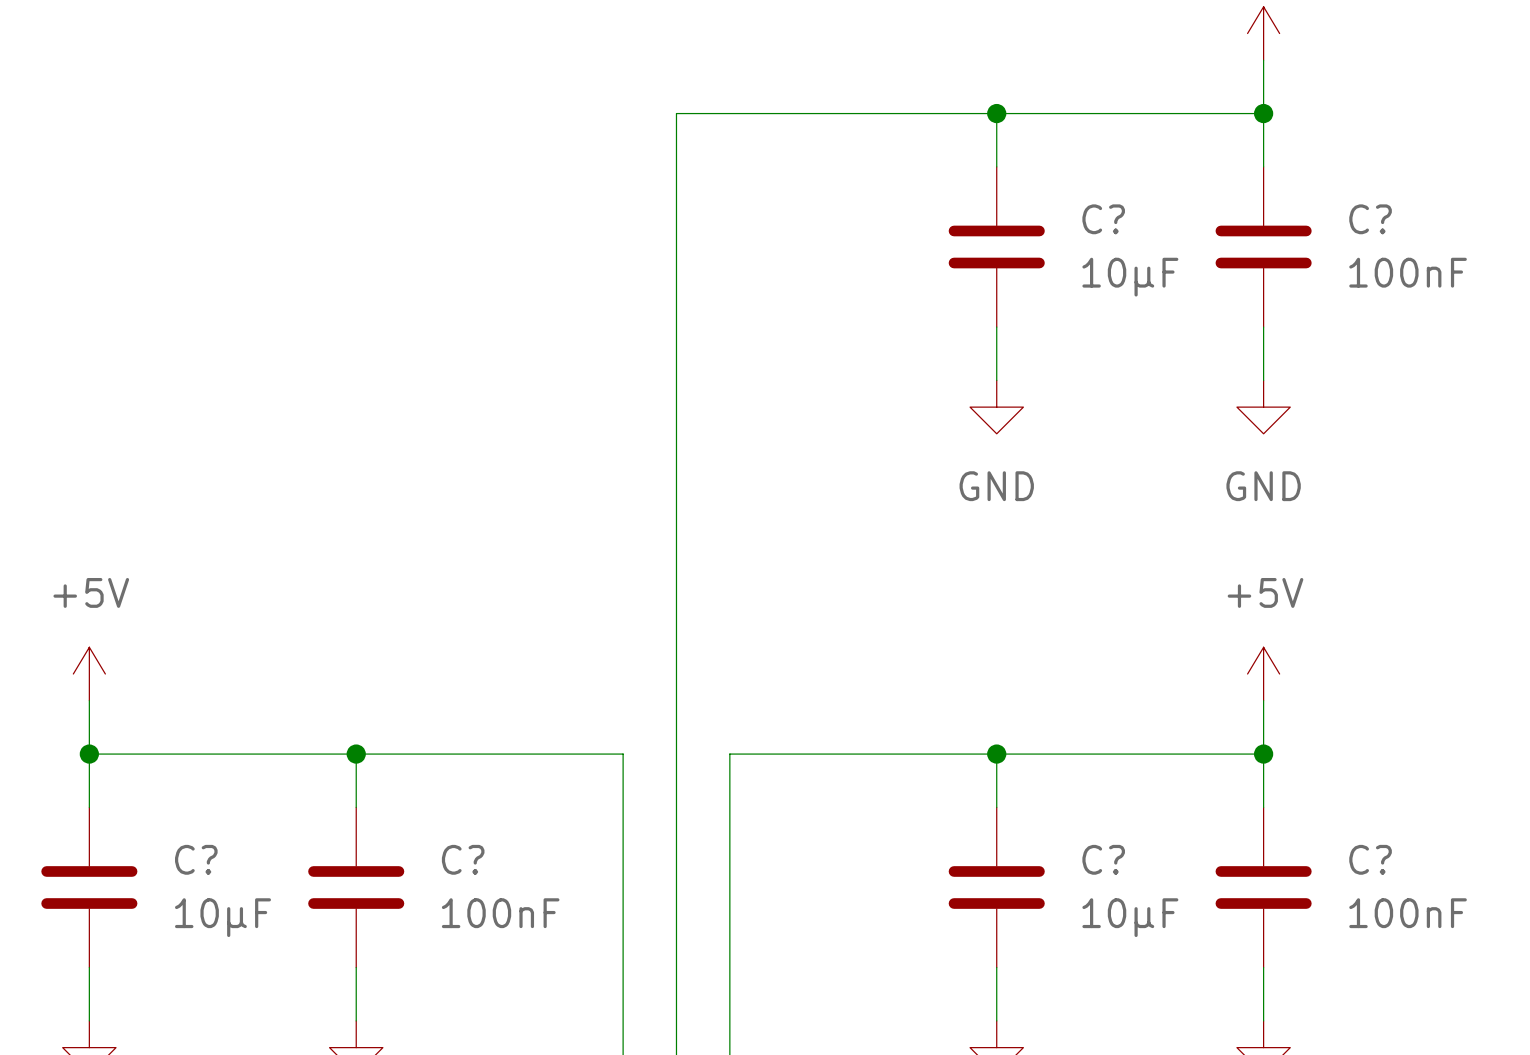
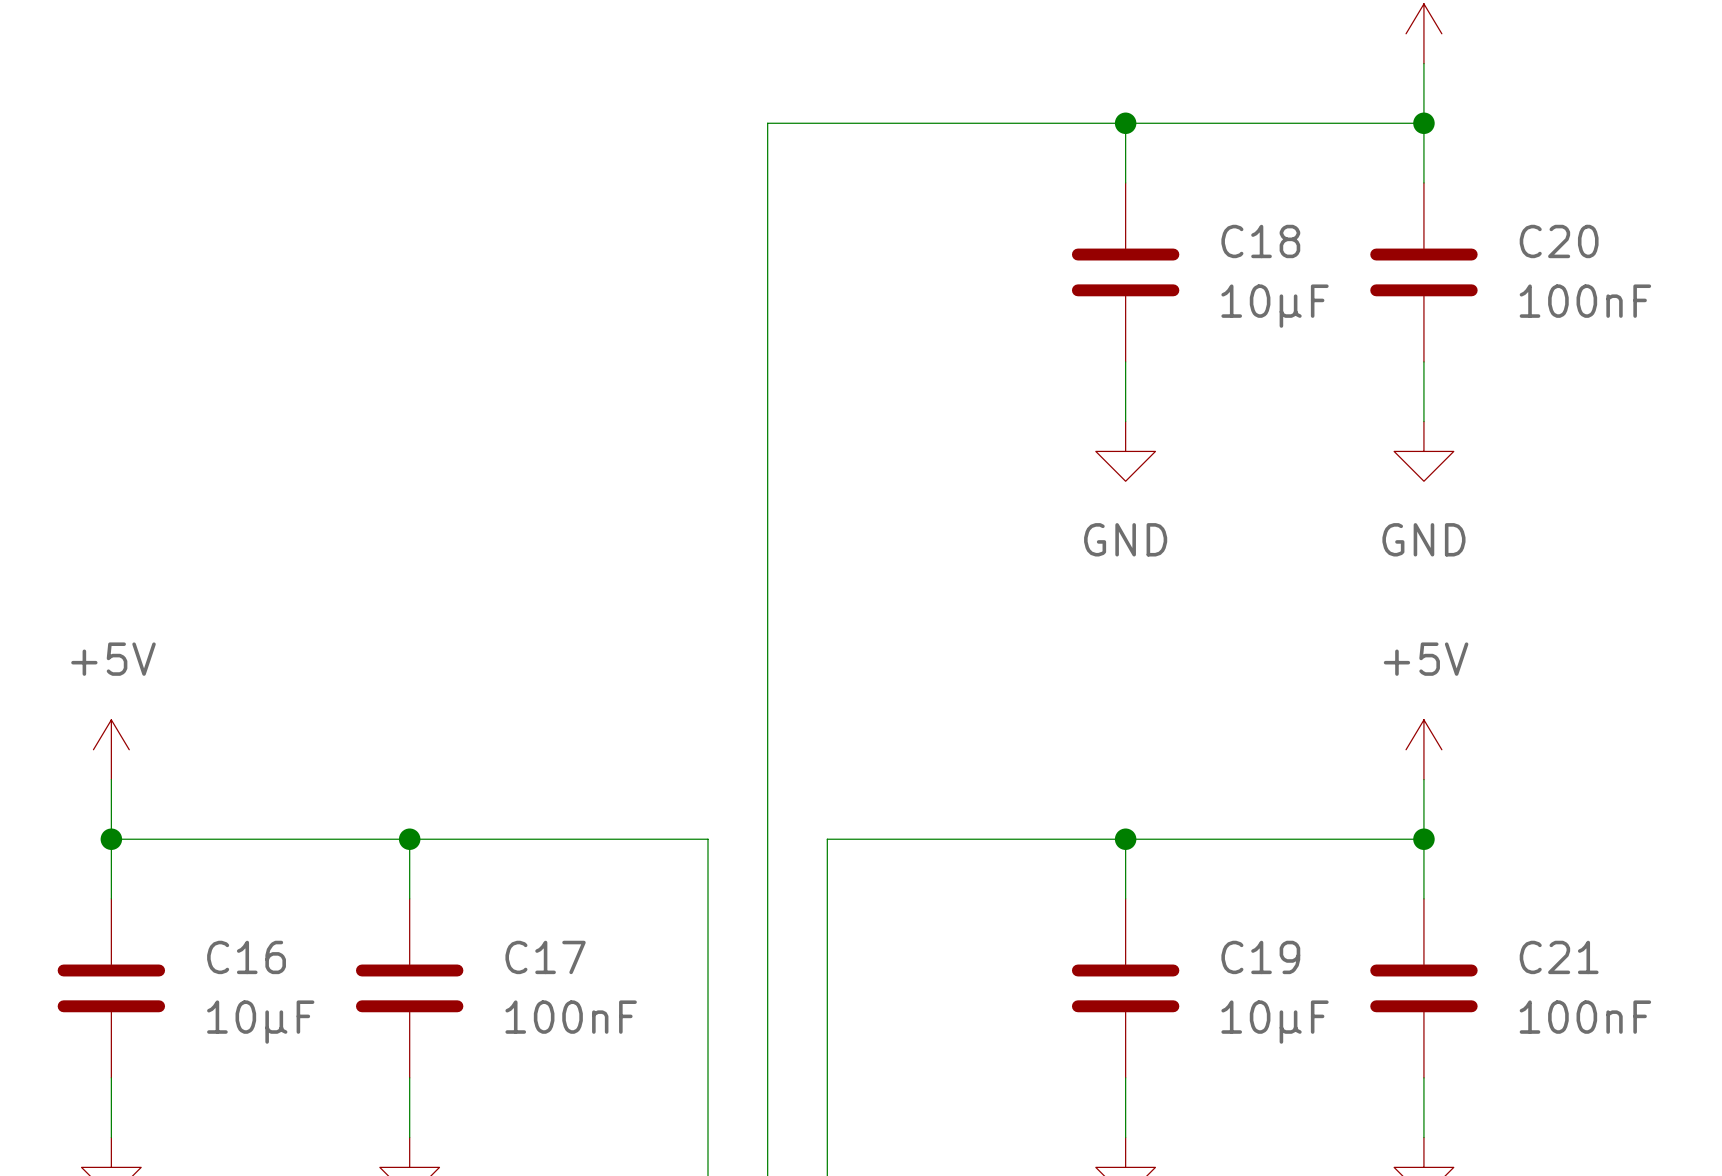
C? name: C? (1103, 219) -> C18 (1260, 241)
C? name: C? (1370, 219) -> C20 (1559, 241)
C? name: C? (196, 859) -> C16 (246, 957)
C? name: C? (463, 859) -> C17 (545, 957)
C? name: C? (1103, 859) -> C19 (1260, 957)
C? name: C? (1370, 859) -> C21 (1559, 957)

